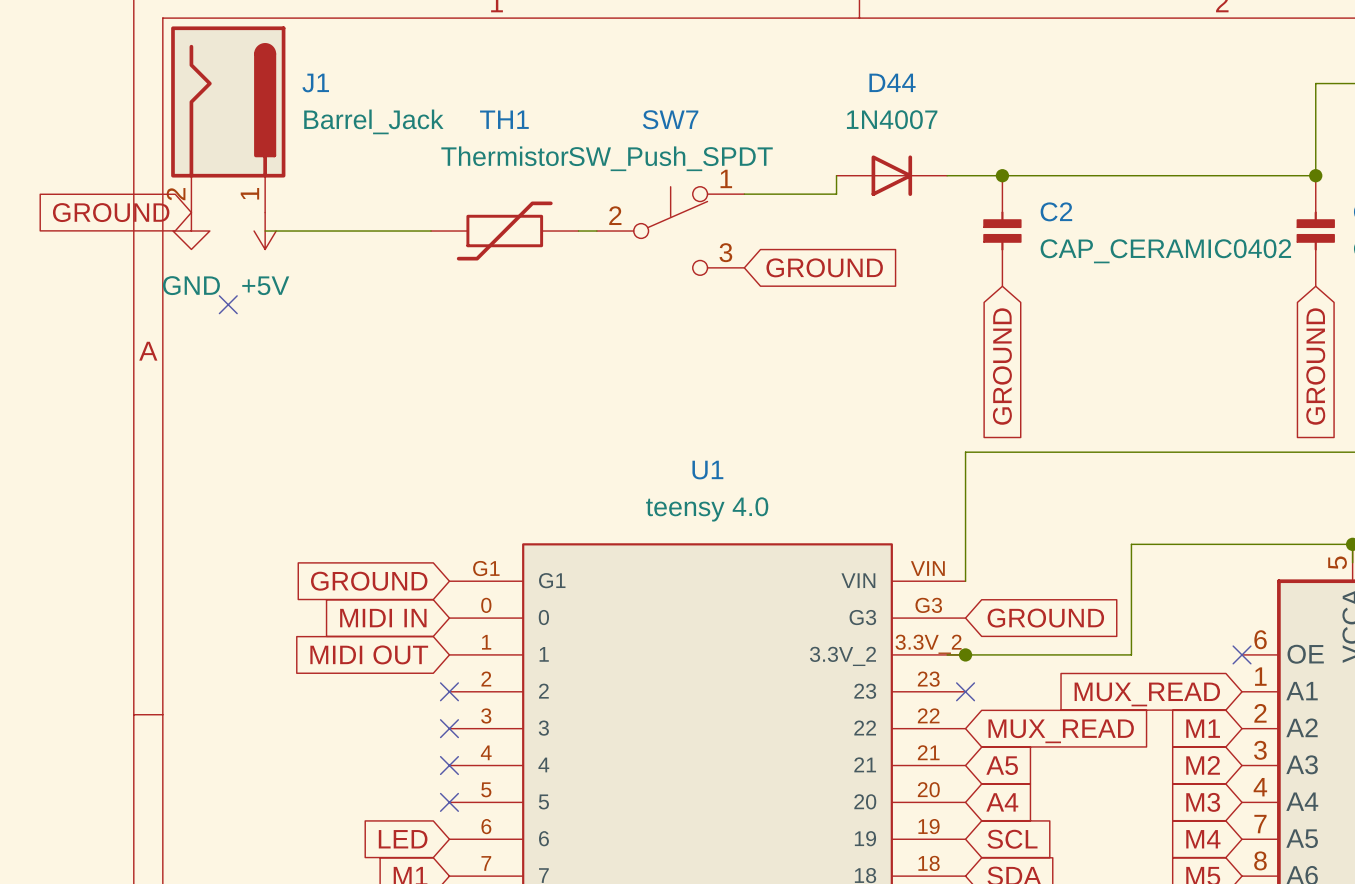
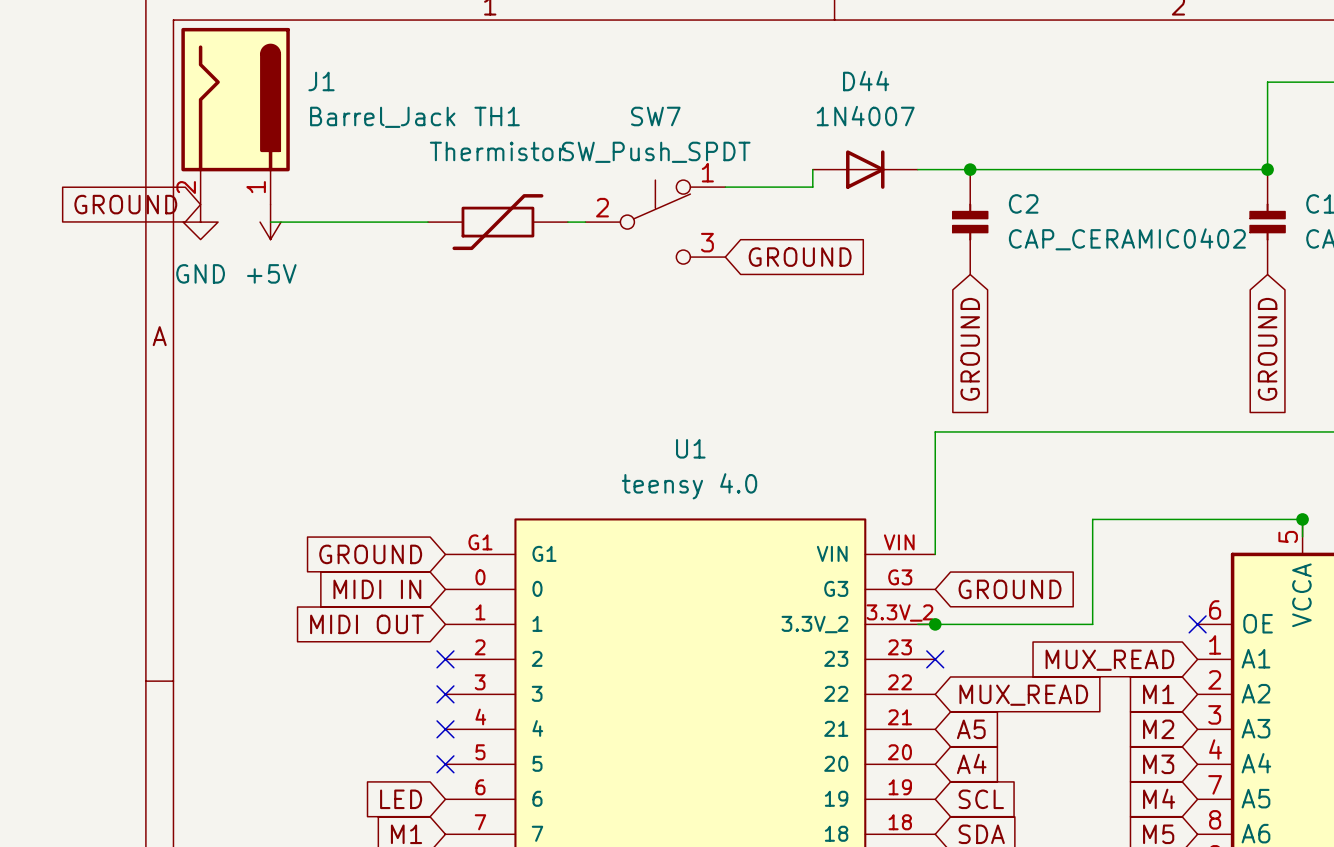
no-connect mark: (228, 304) -> none

